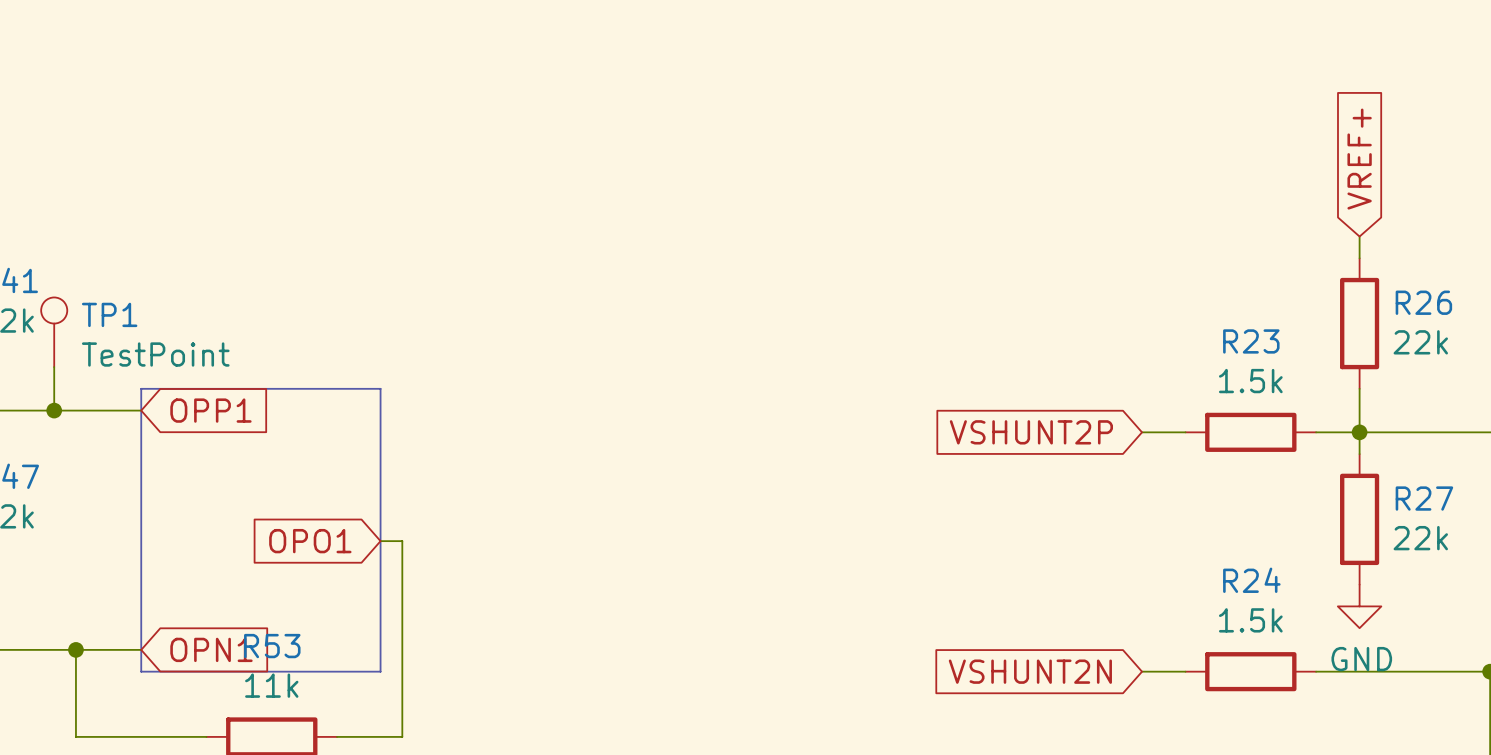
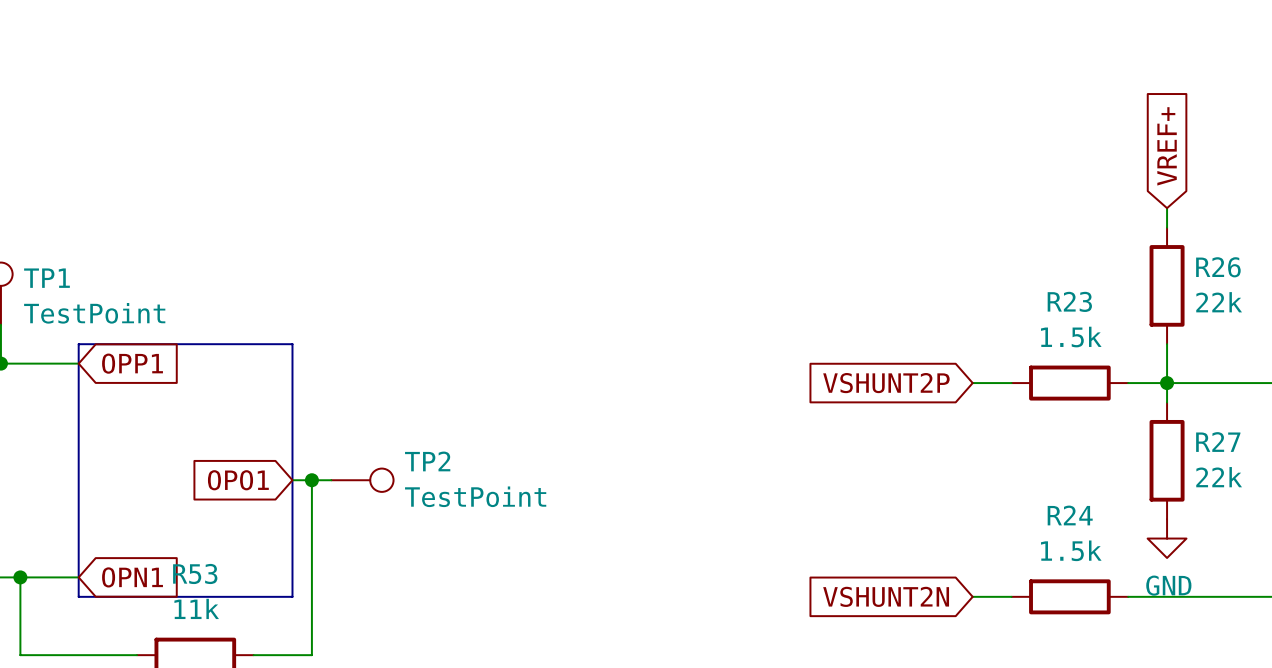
wire: none -> (311, 480) (331, 480)
junction: none -> (311, 480)
TP2: none -> TestPoint (362, 480)

